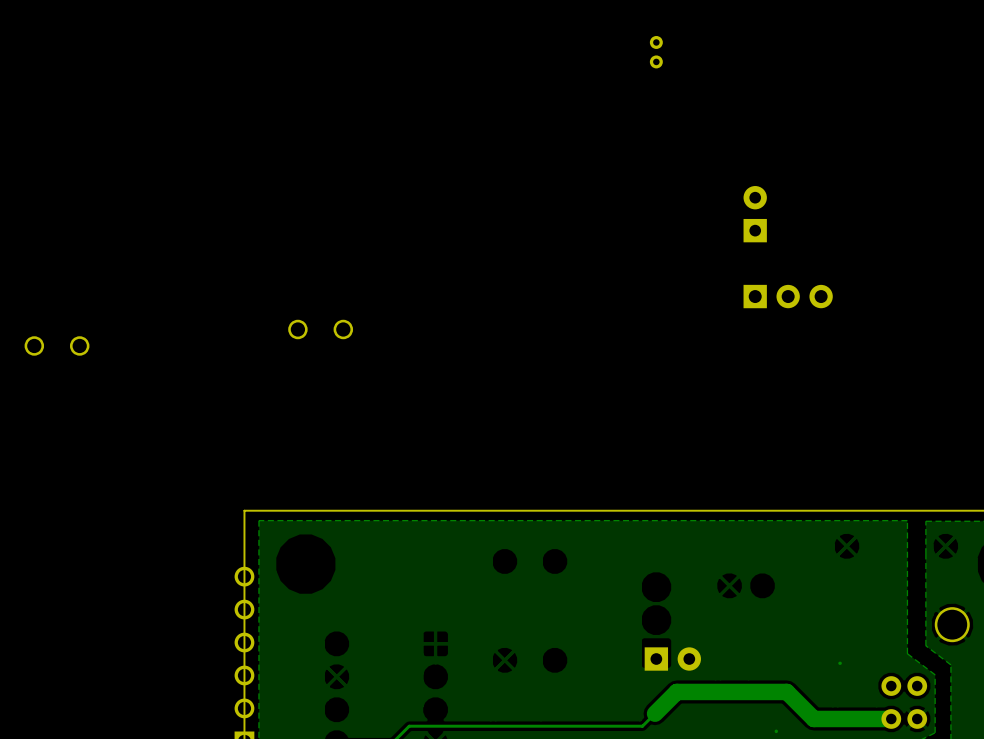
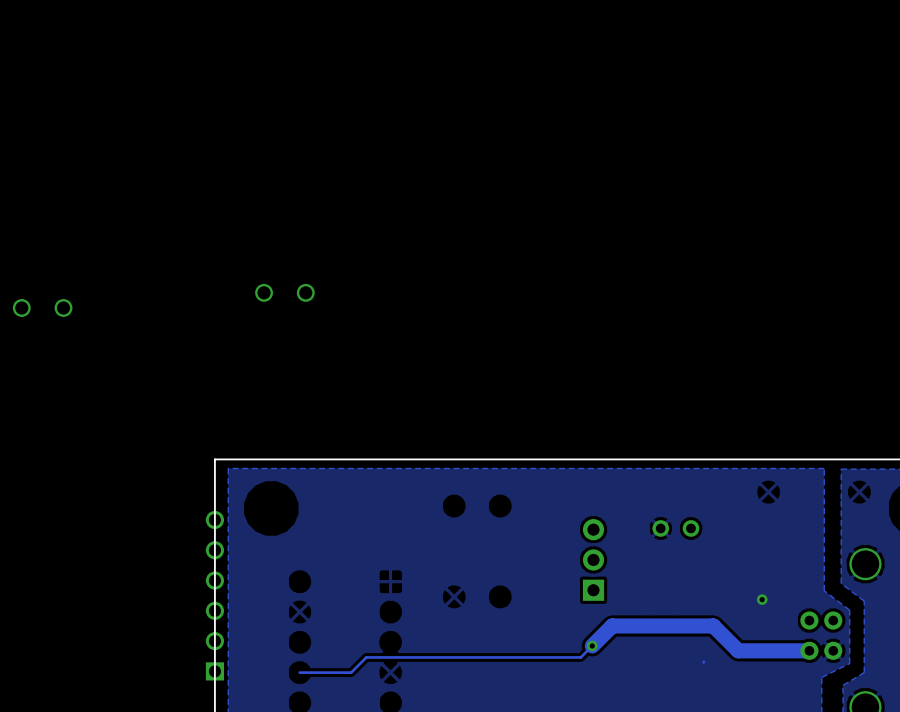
part: (656, 52) -> none
part: (755, 214) -> none
part: (788, 296) -> none
part: none -> (675, 528)
part: none -> (593, 559)
part: (672, 659) -> none
via: none -> (762, 599)
via: none -> (592, 645)

